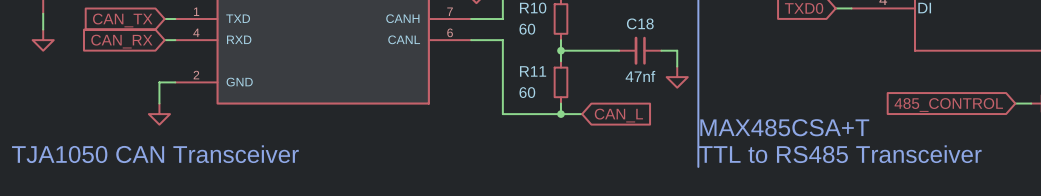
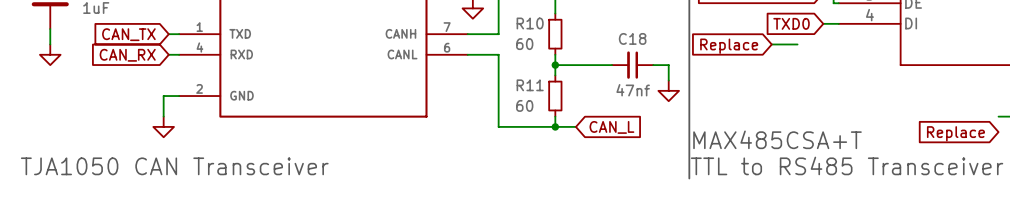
wire: none -> (771, 44) (797, 44)
global label: none -> Replace (729, 46)
global label: 485_CONTROL (948, 104) -> none
global label: none -> Replace (955, 133)

